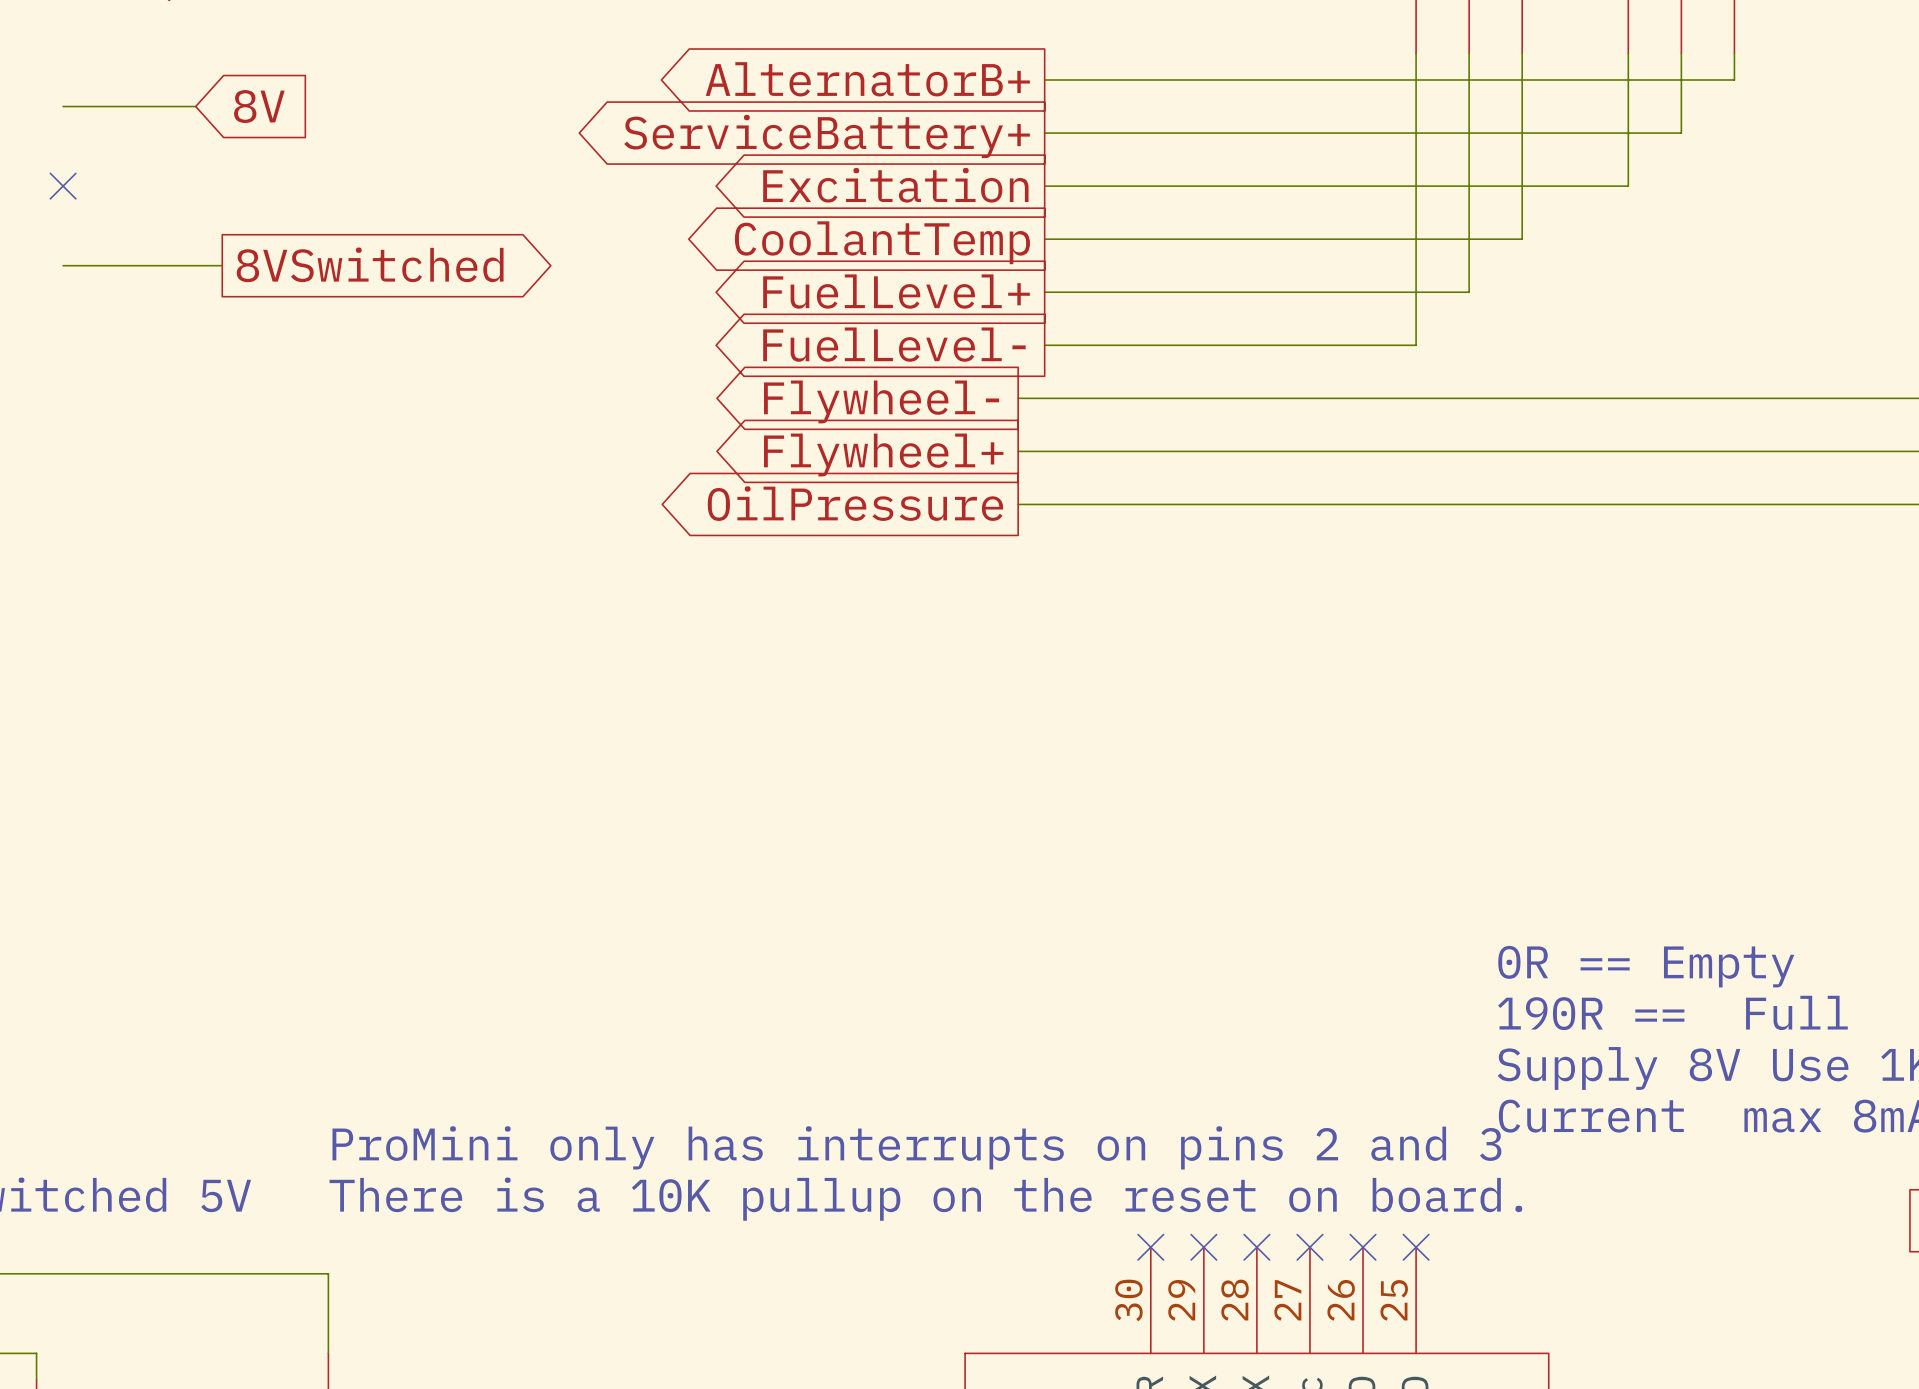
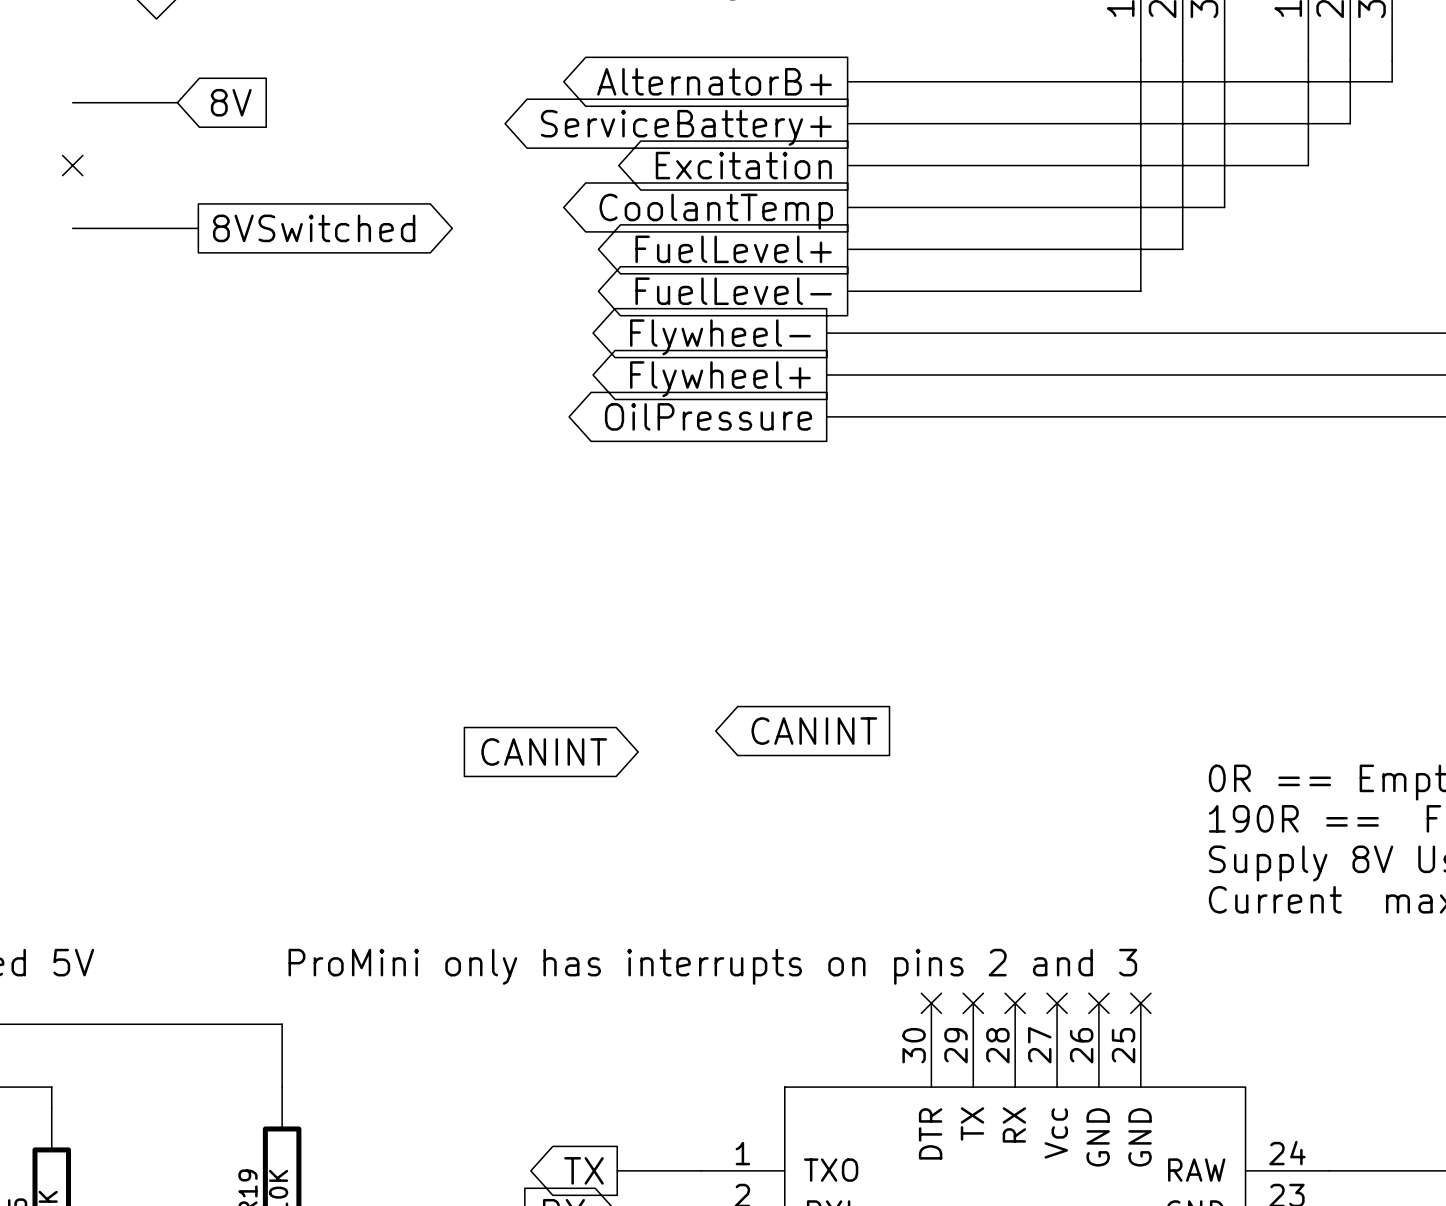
global label: none -> CANINT (814, 731)
global label: none -> CANINT (544, 751)
text: ProMini only has interrupts on pins 2 and 3 (916, 1147) -> none
text: There is a 10K pullup on the reset on board. (925, 1199) -> ProMini only has interrupts on pins 2 and 3 (712, 966)

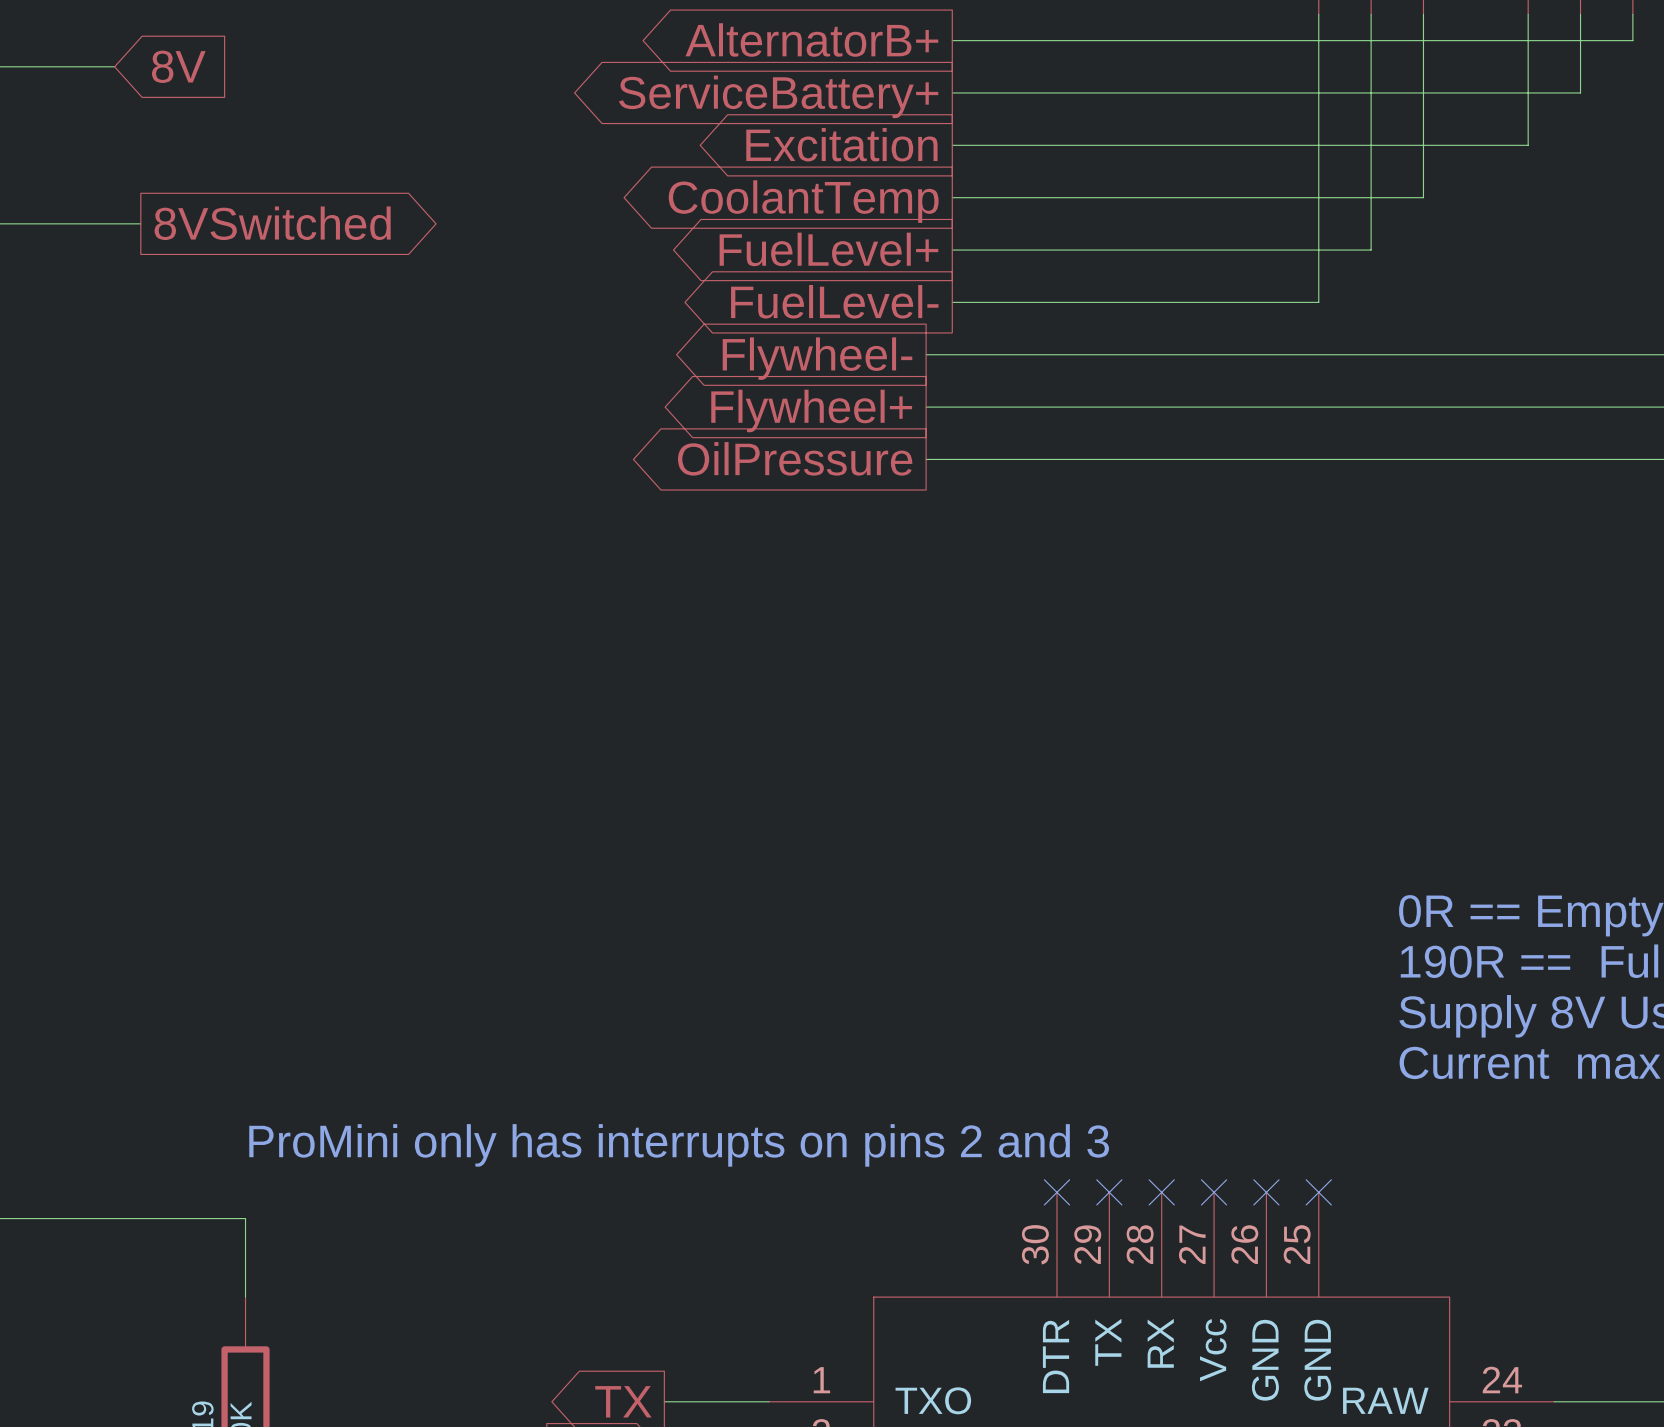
global label: CANINT (814, 731) -> none
global label: CANINT (544, 751) -> none

